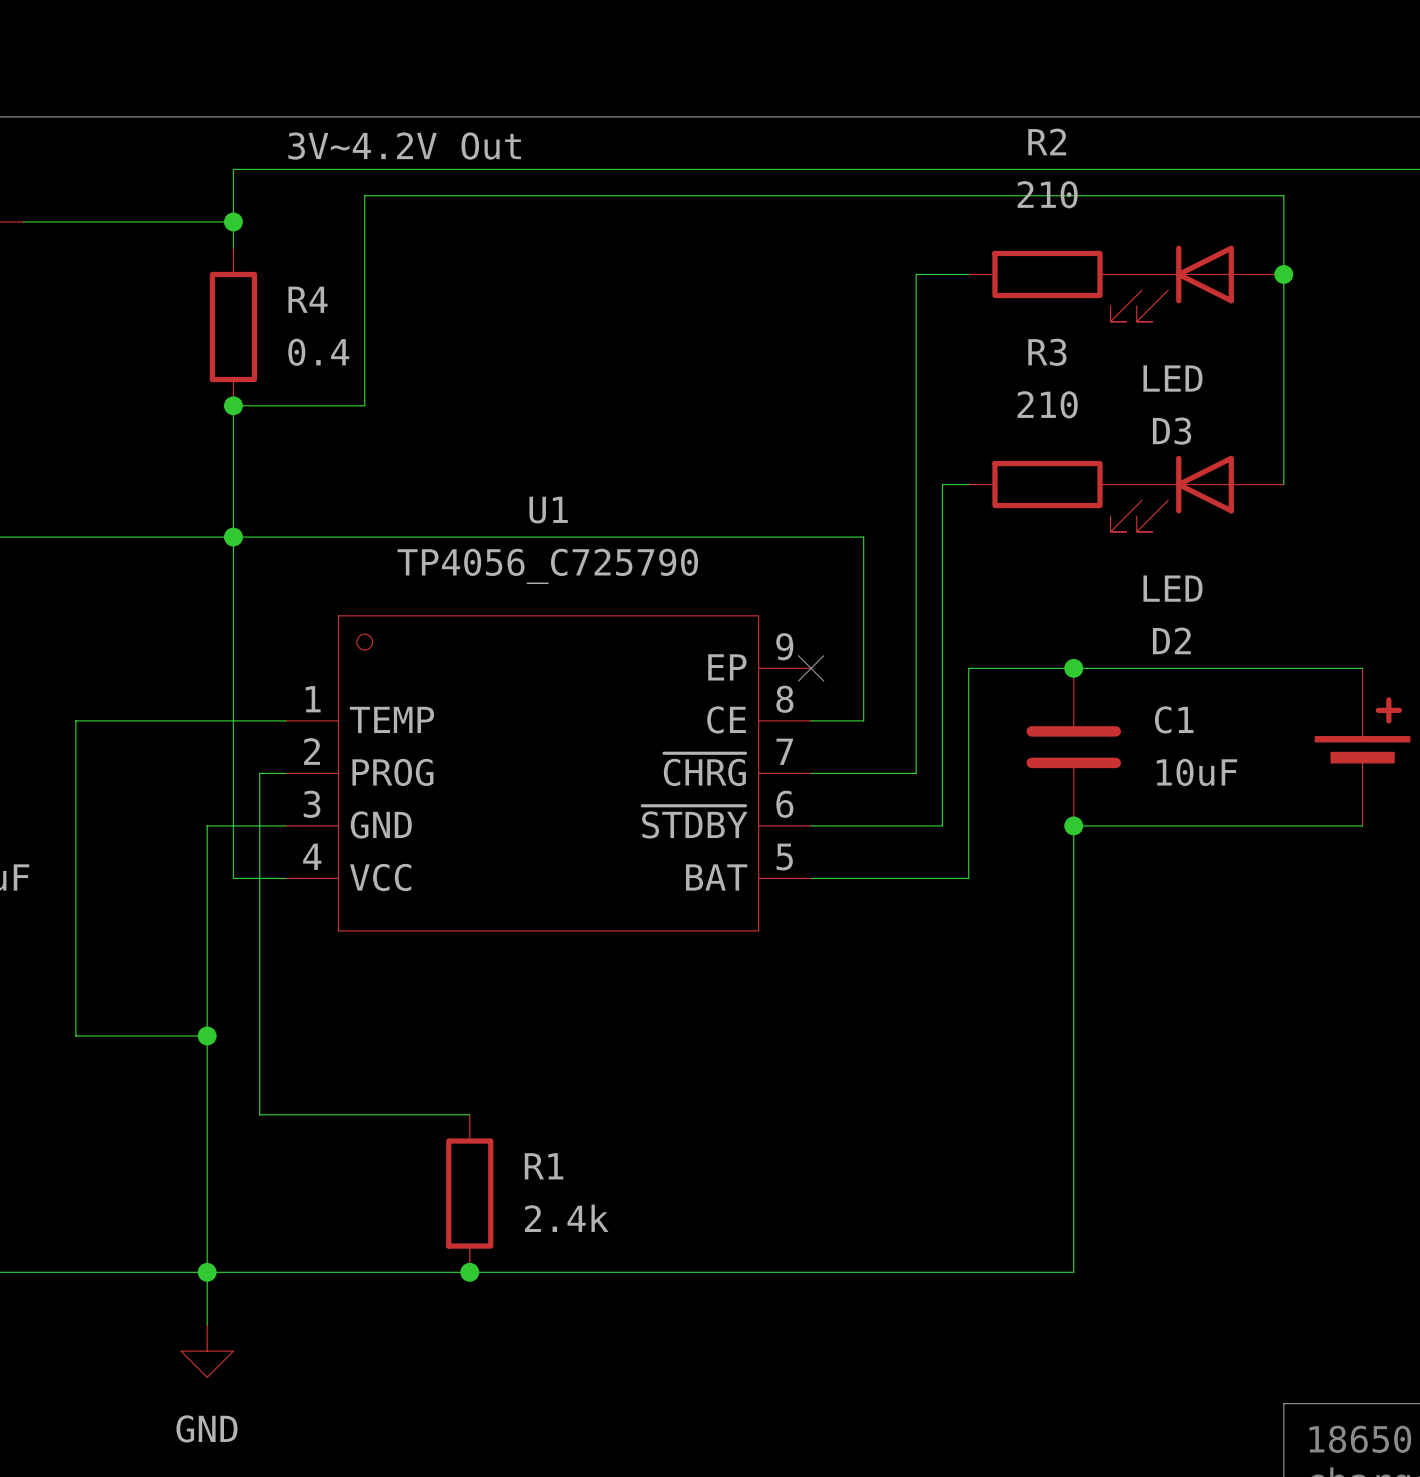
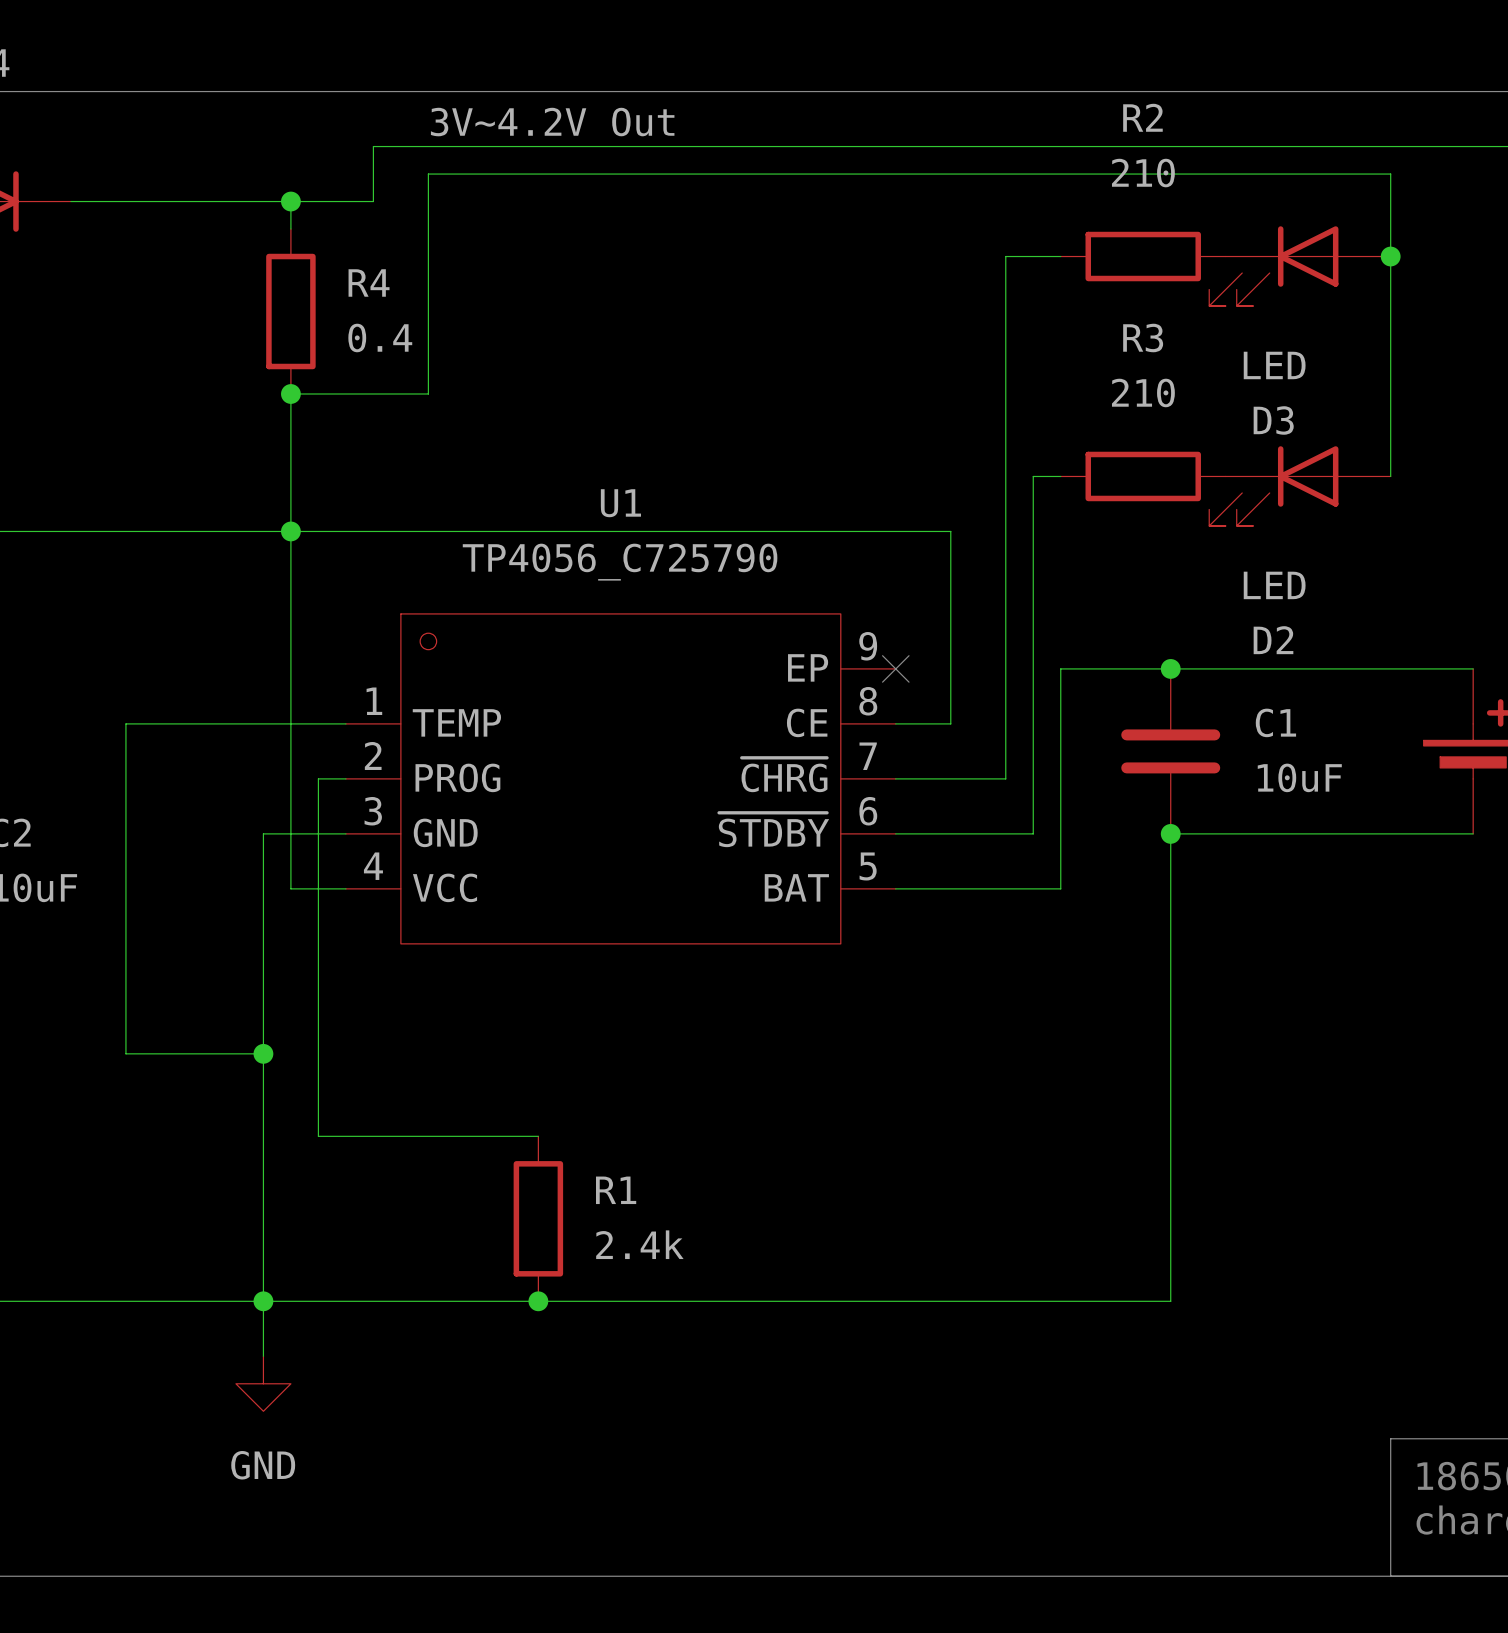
label position: 3V~4.2V Out (404, 146) -> 3V~4.2V Out (552, 122)
wire: (312, 169) (233, 169) (233, 221) -> (373, 146) (373, 201) (290, 201)

